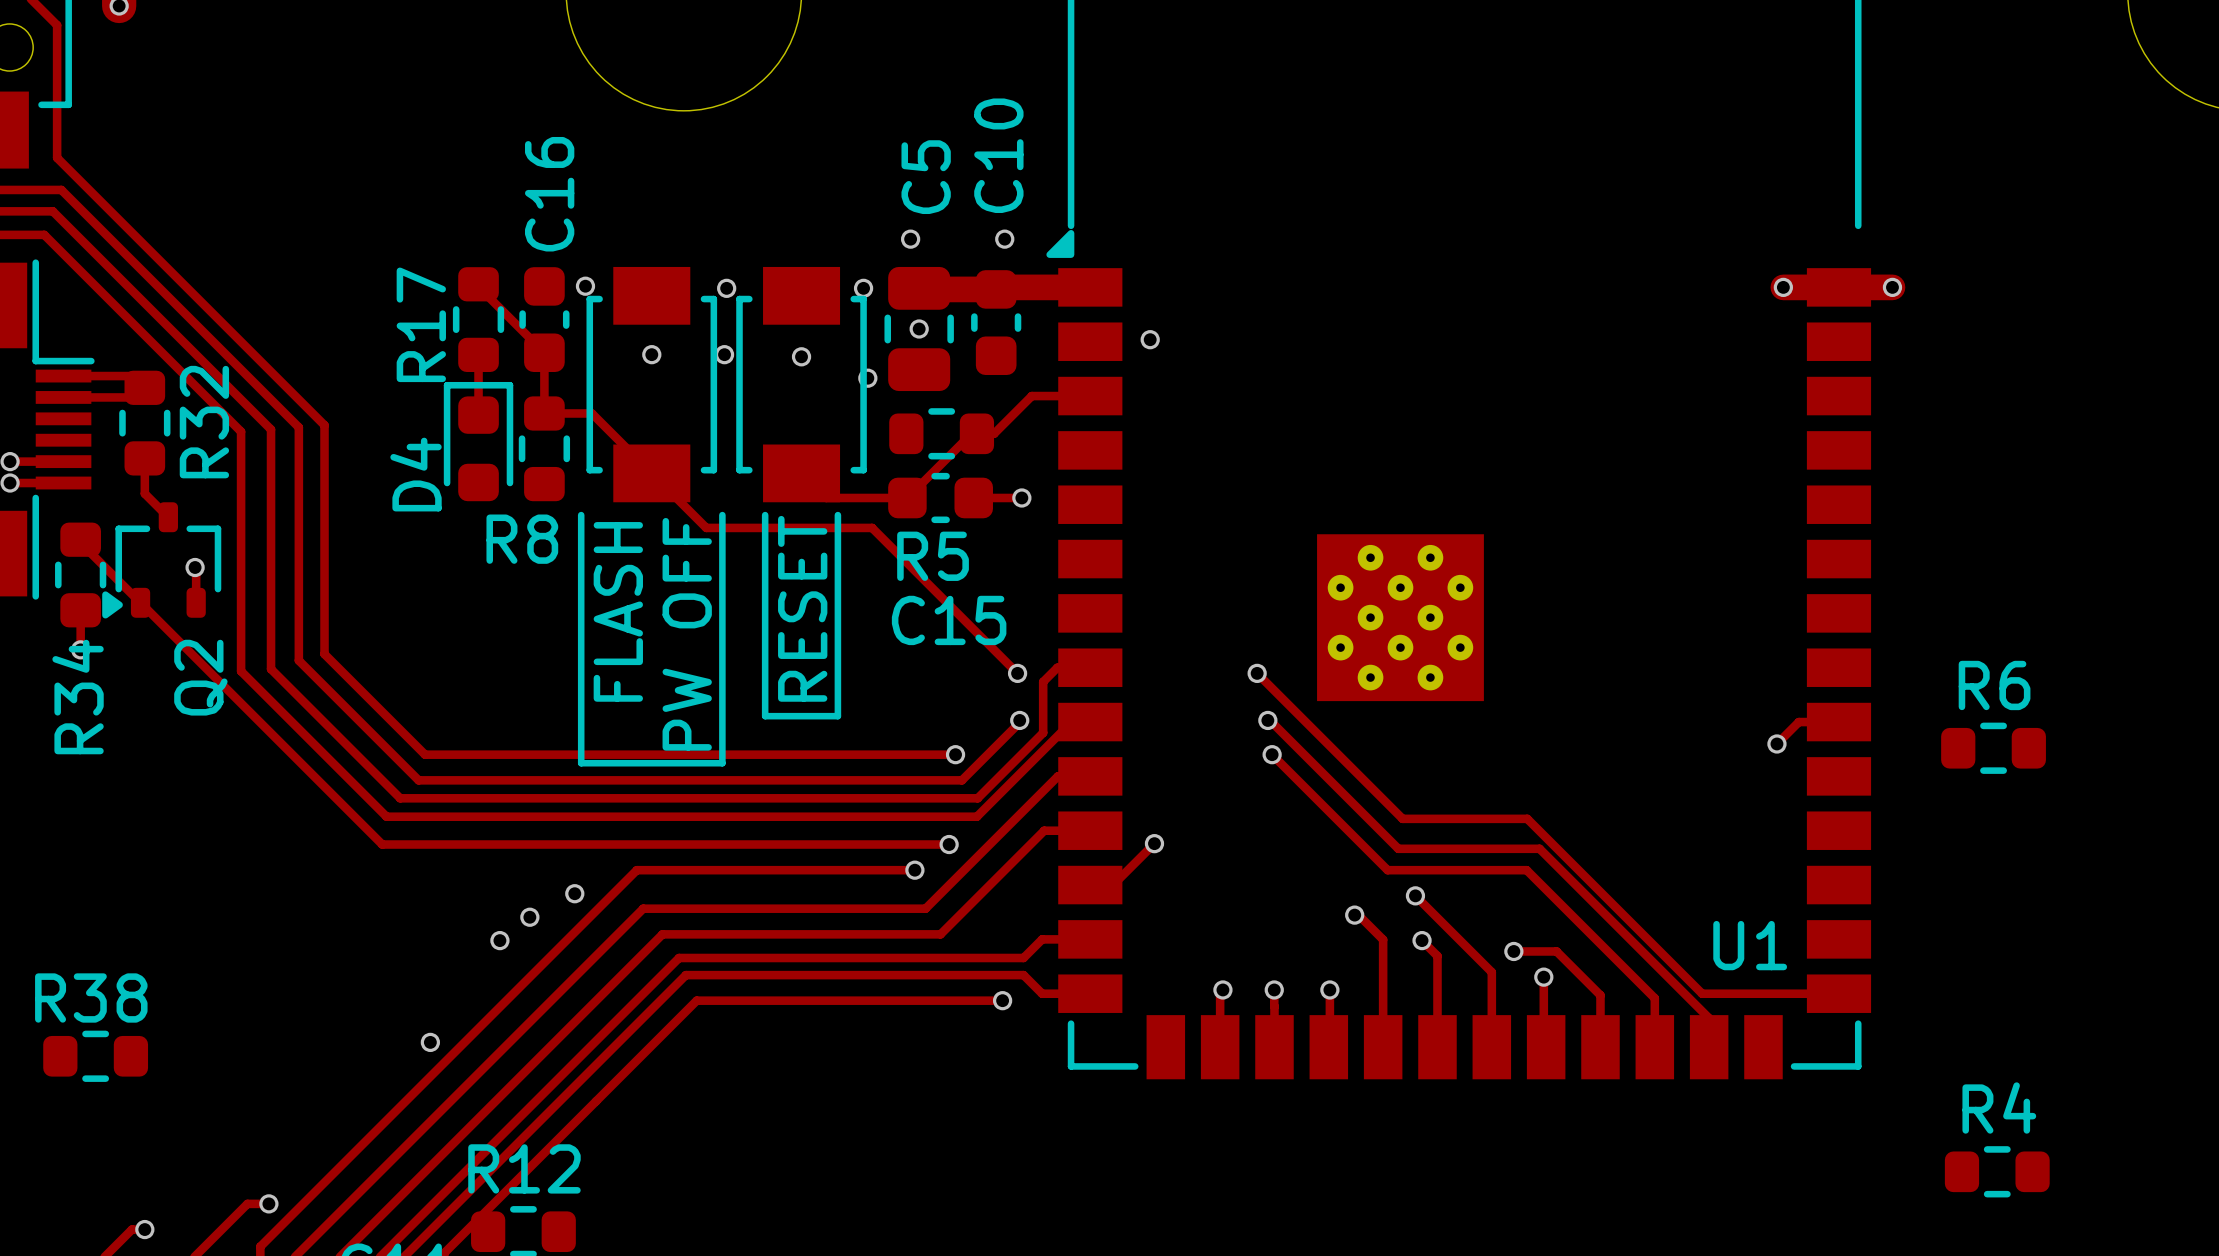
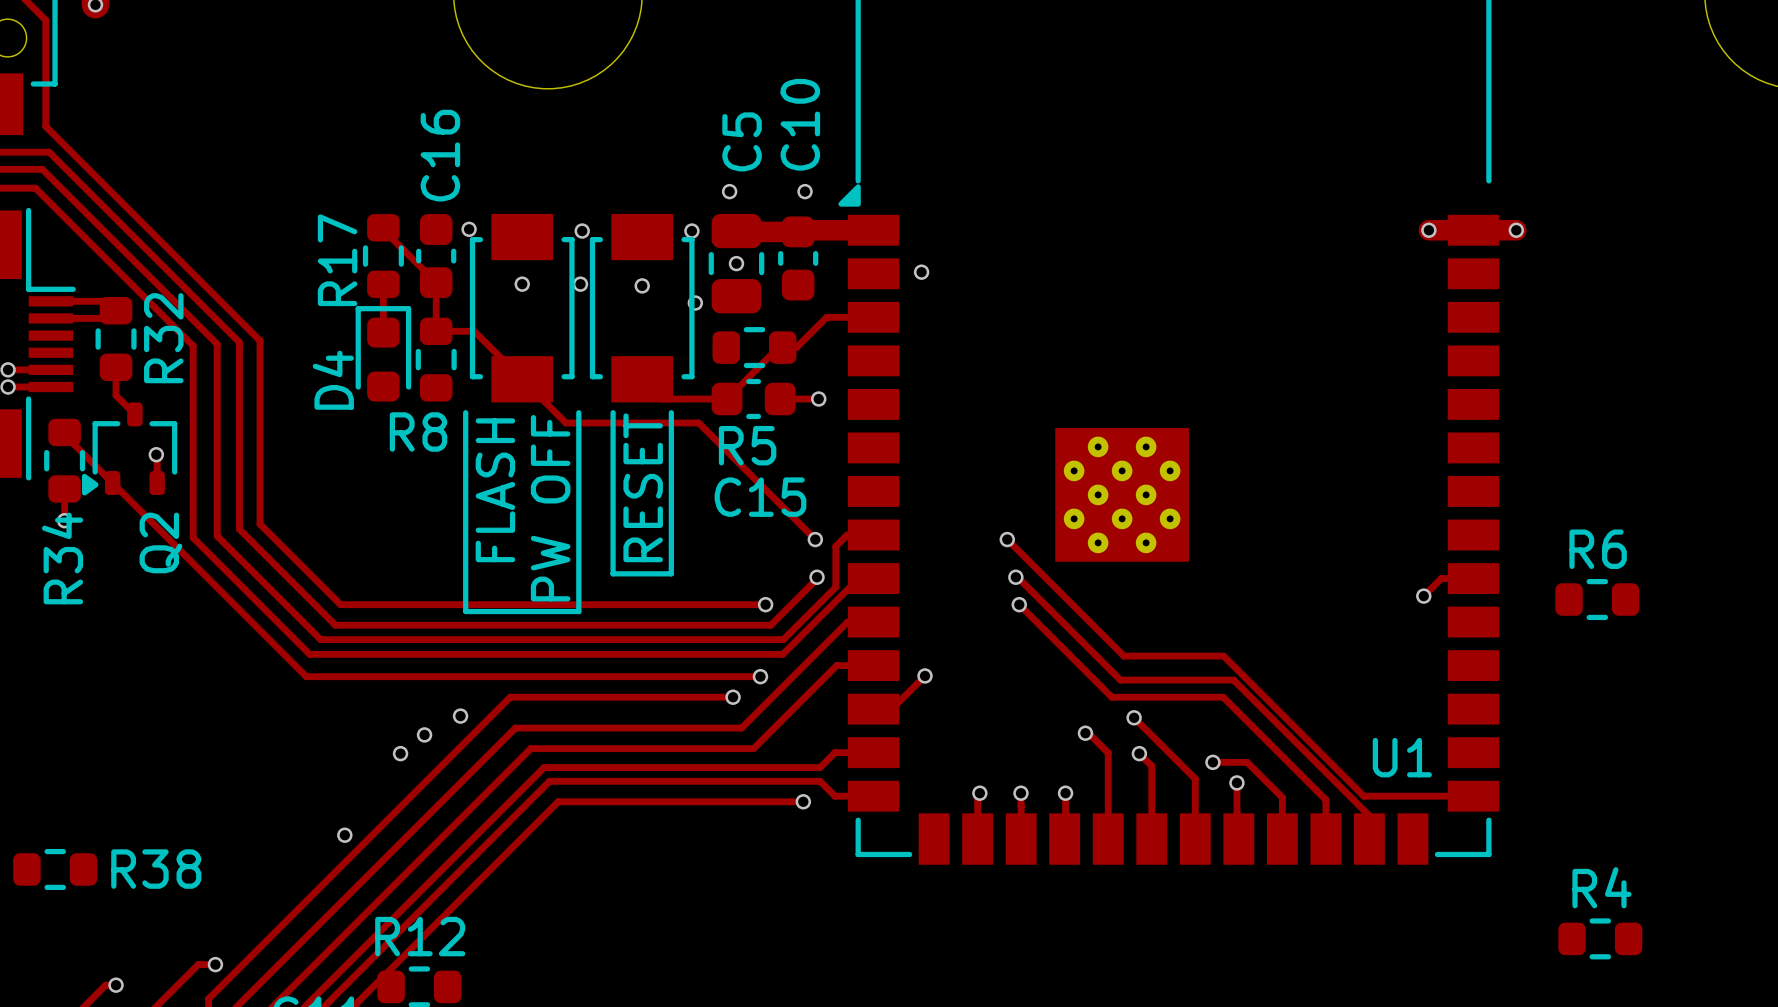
R38 name position: R38 (91, 998) -> R38 (156, 869)
R38 position: (95, 1056) -> (55, 869)

